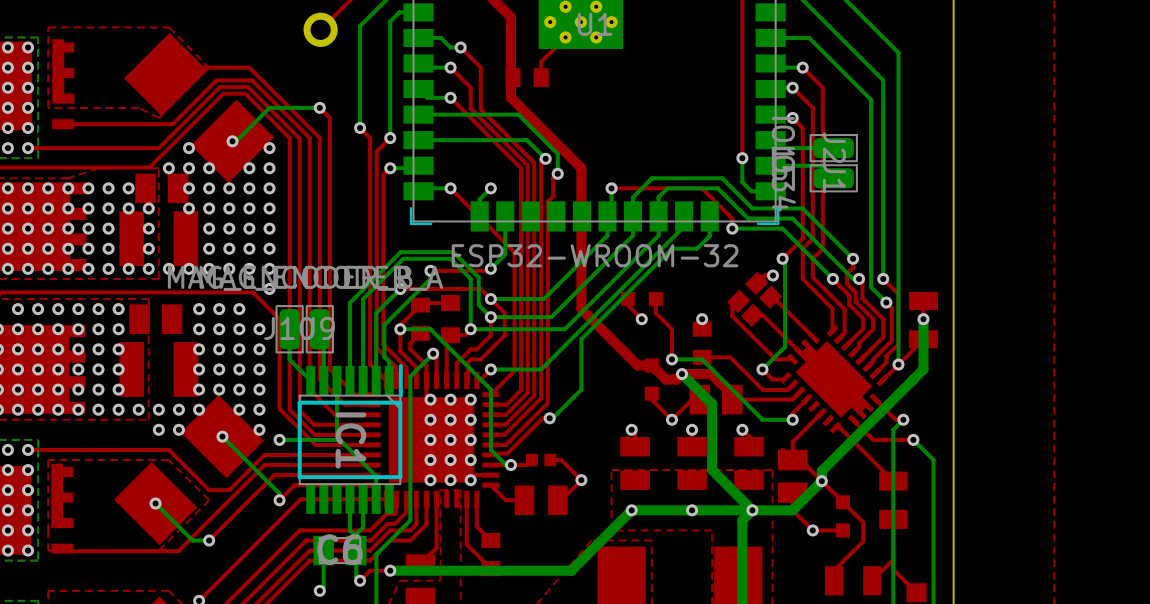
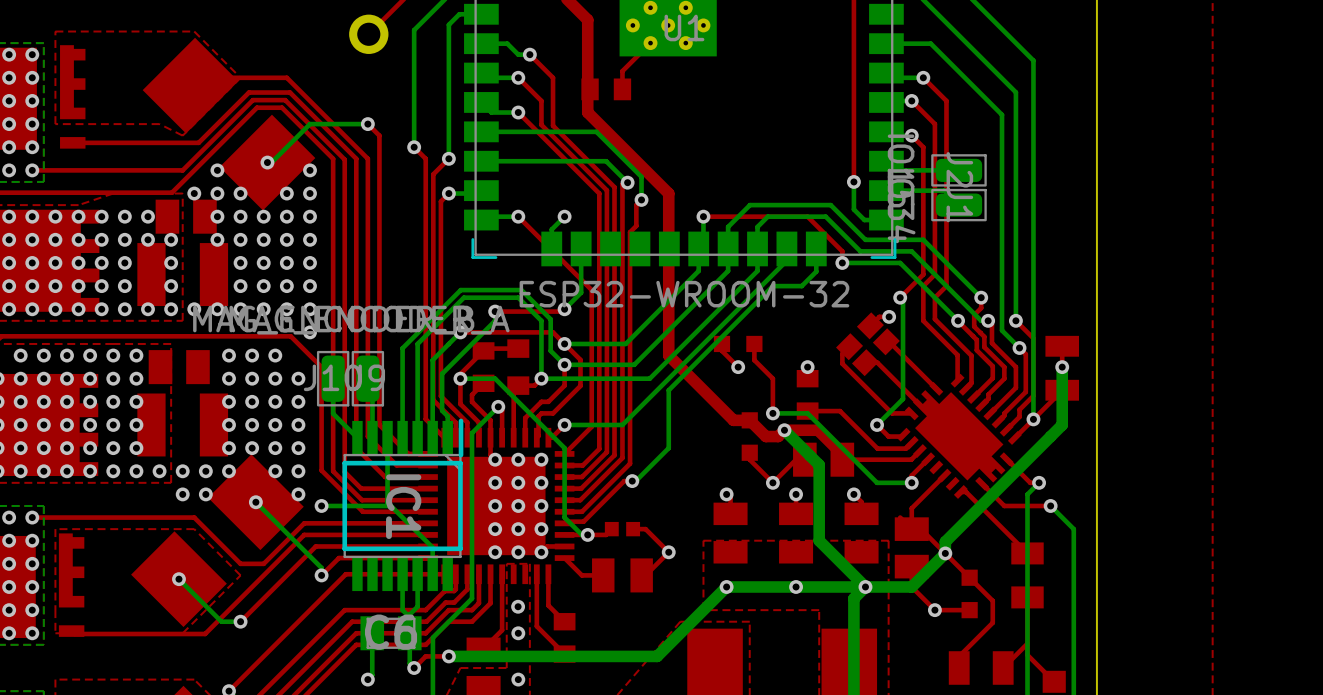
via: none -> (518, 606)
via: none -> (518, 633)
via: none -> (518, 679)

